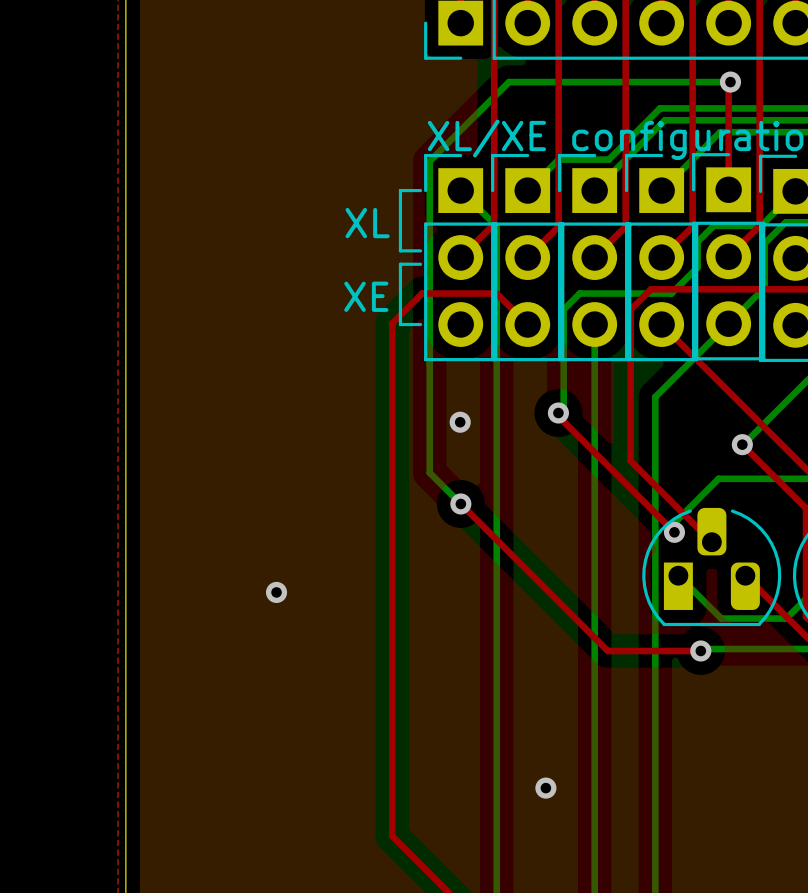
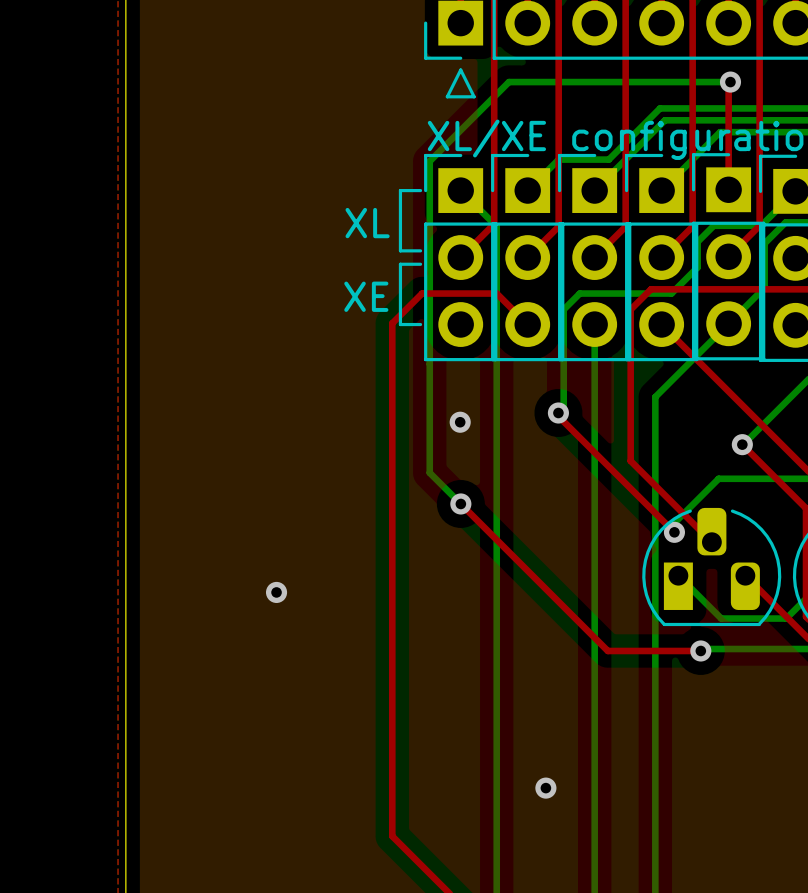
line: none -> (460, 70) (447, 96) (474, 96) (460, 70)

